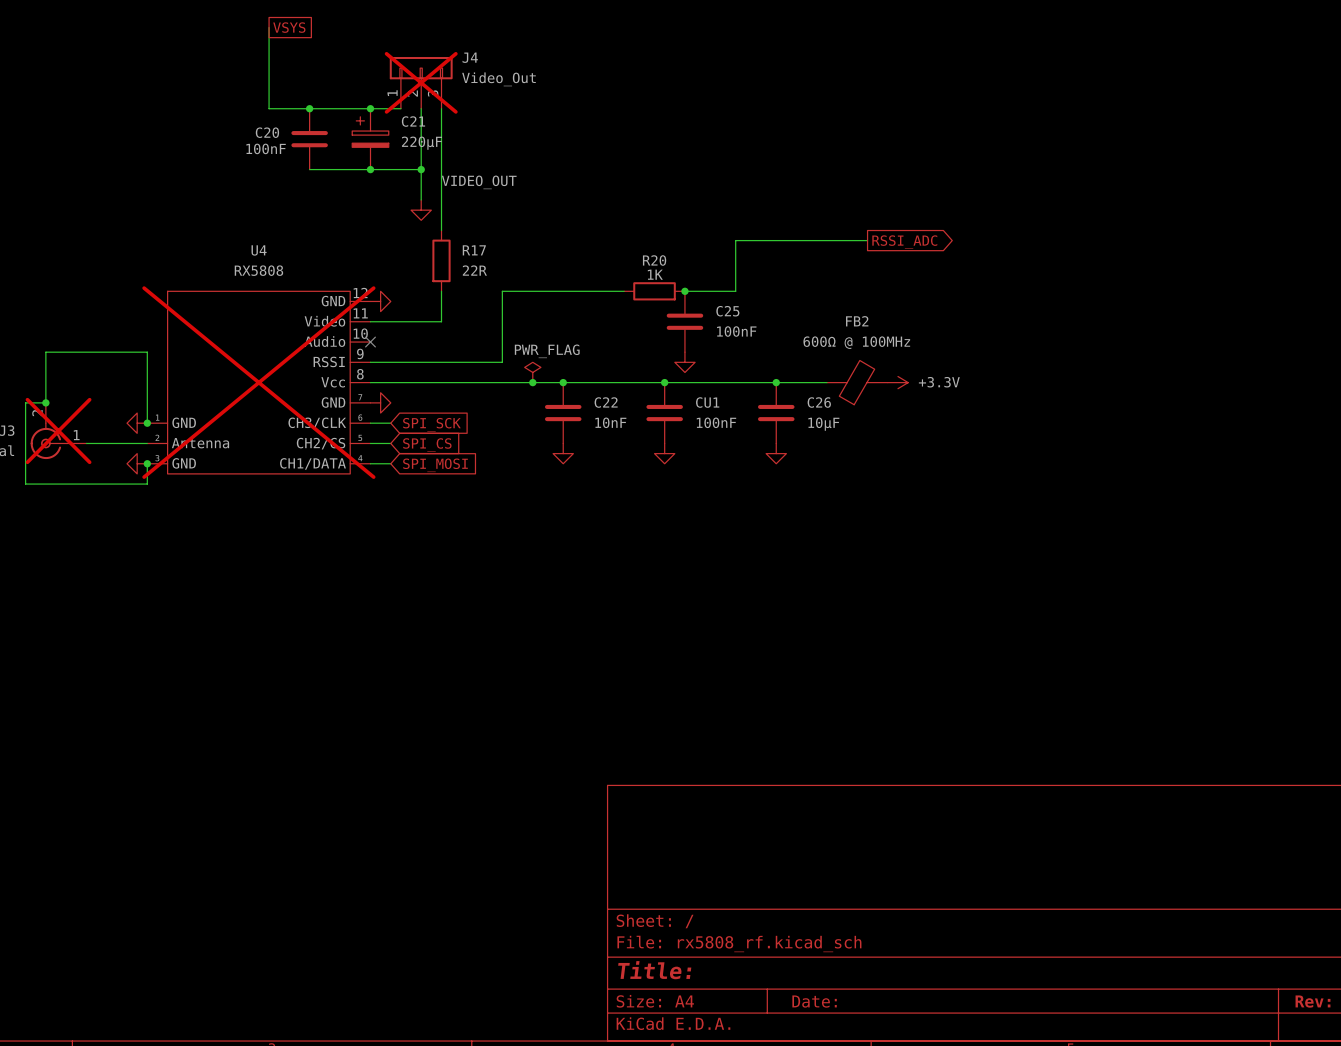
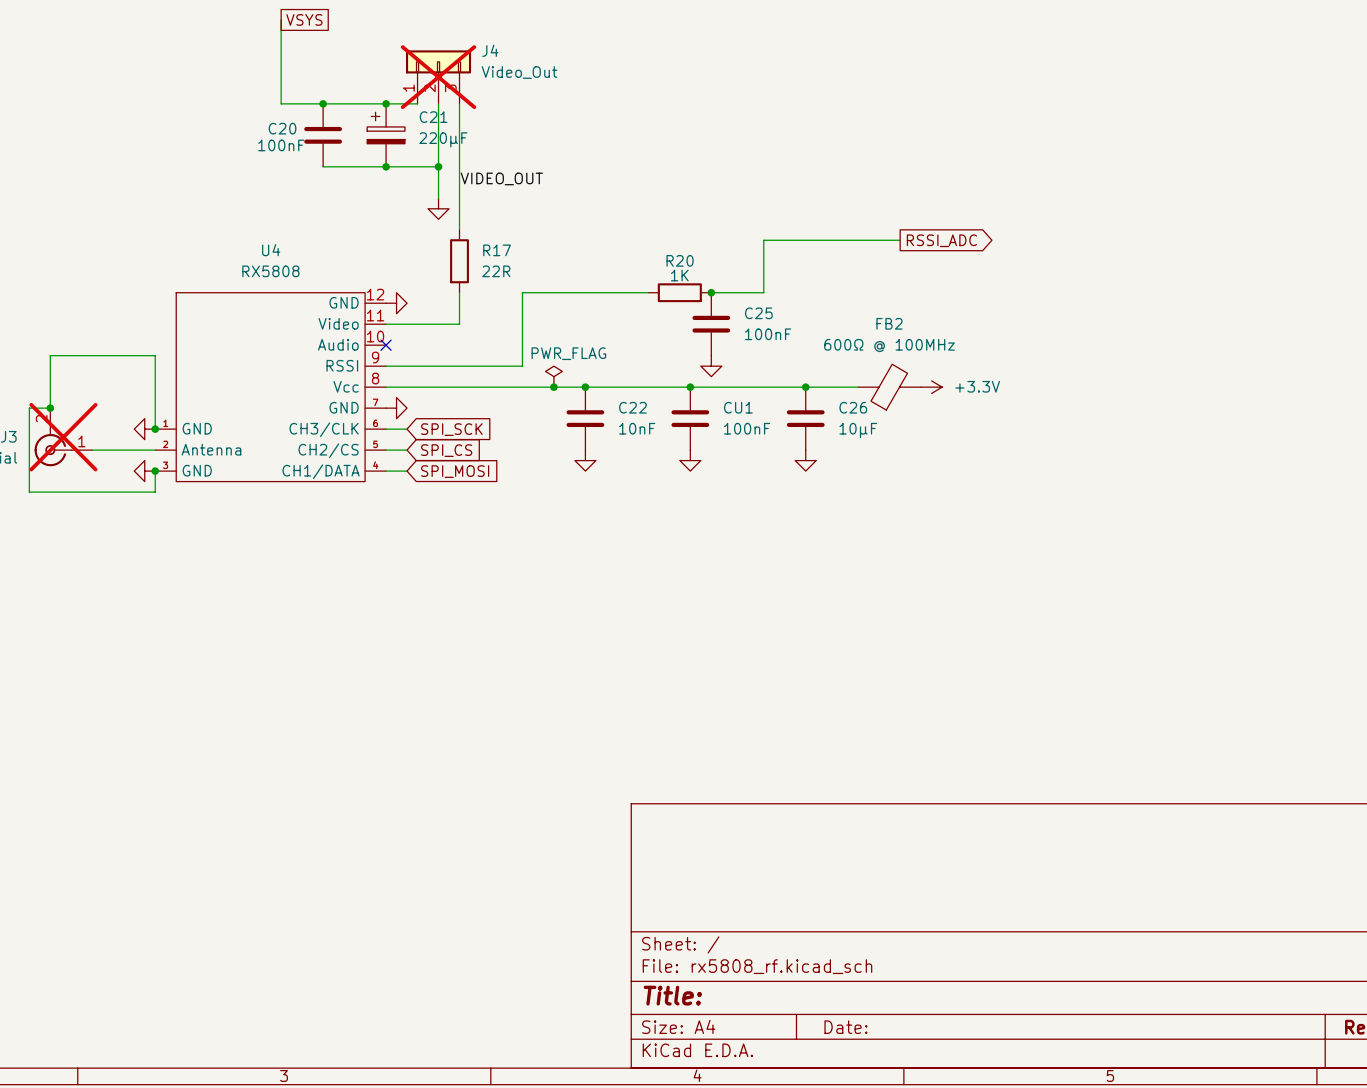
U4 do-not-place cross: (258, 382) -> none

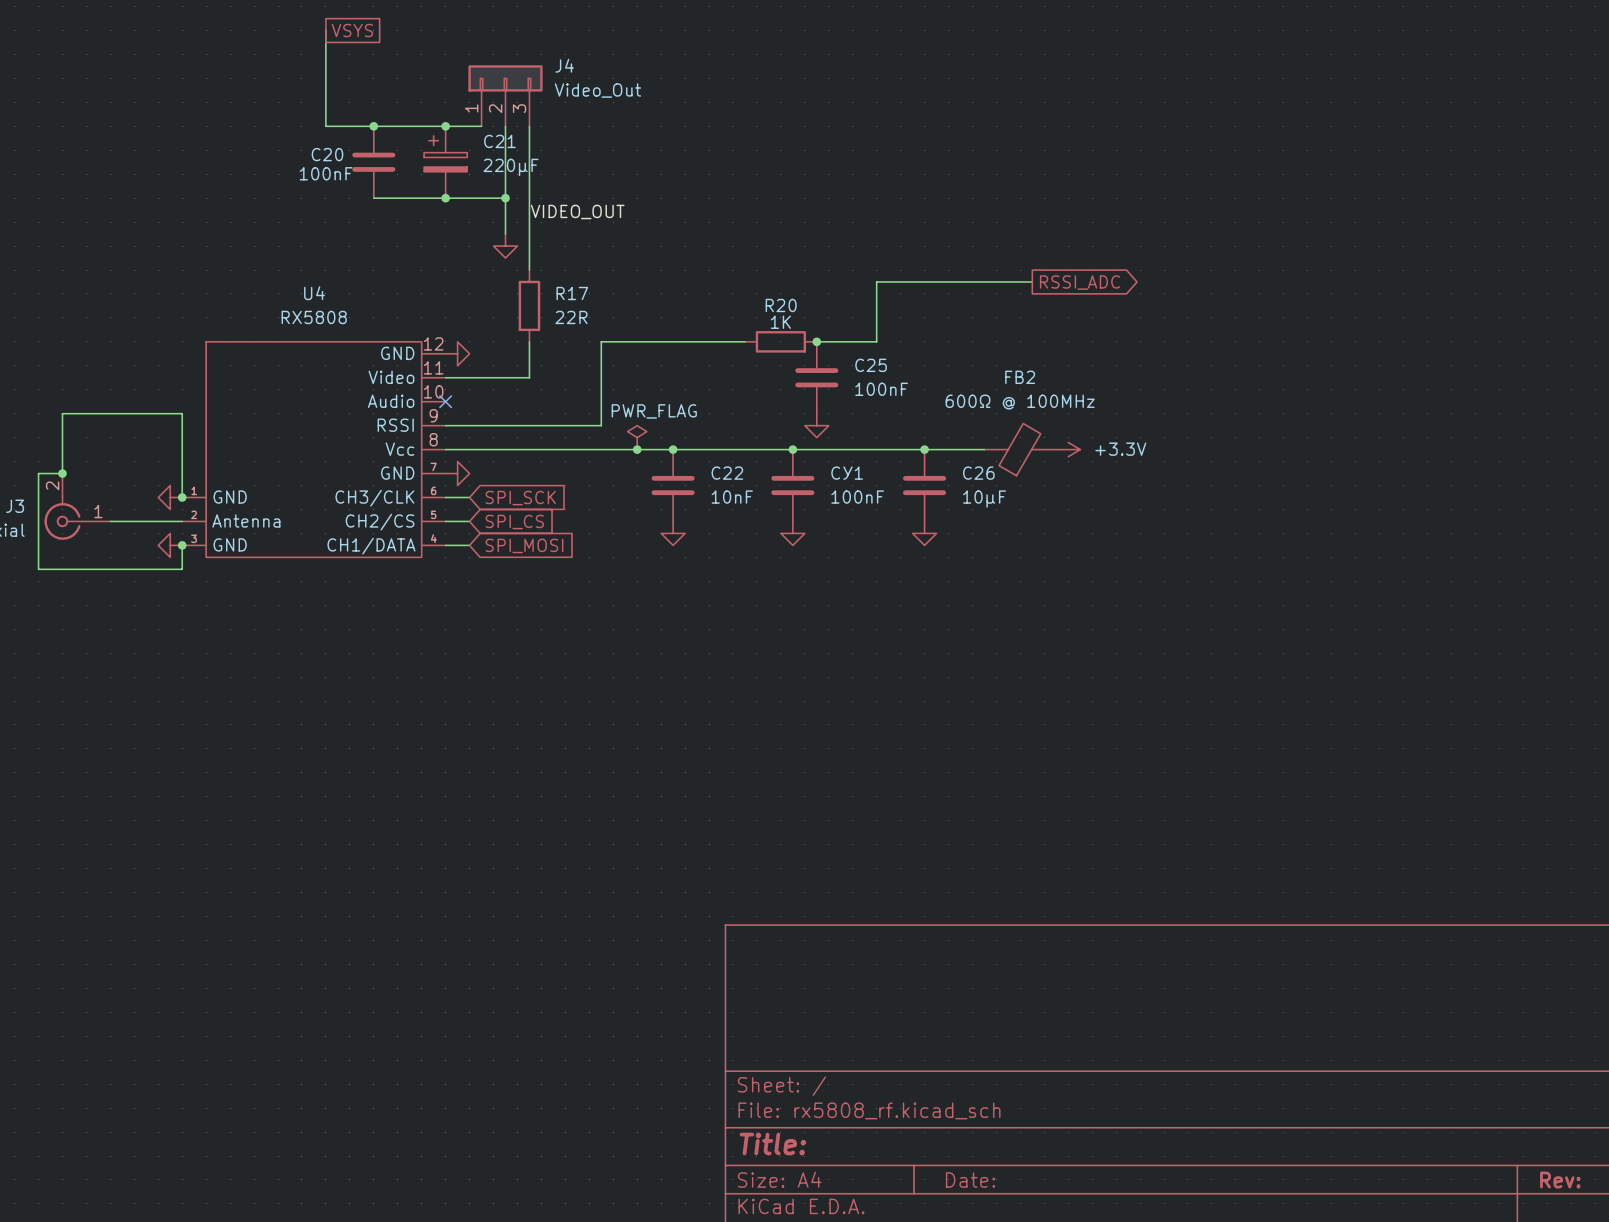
J4 do-not-place cross: (438, 77) -> none
CU1 name: CU1 (738, 407) -> CУ1 (847, 473)
J3 do-not-place cross: (63, 437) -> none

